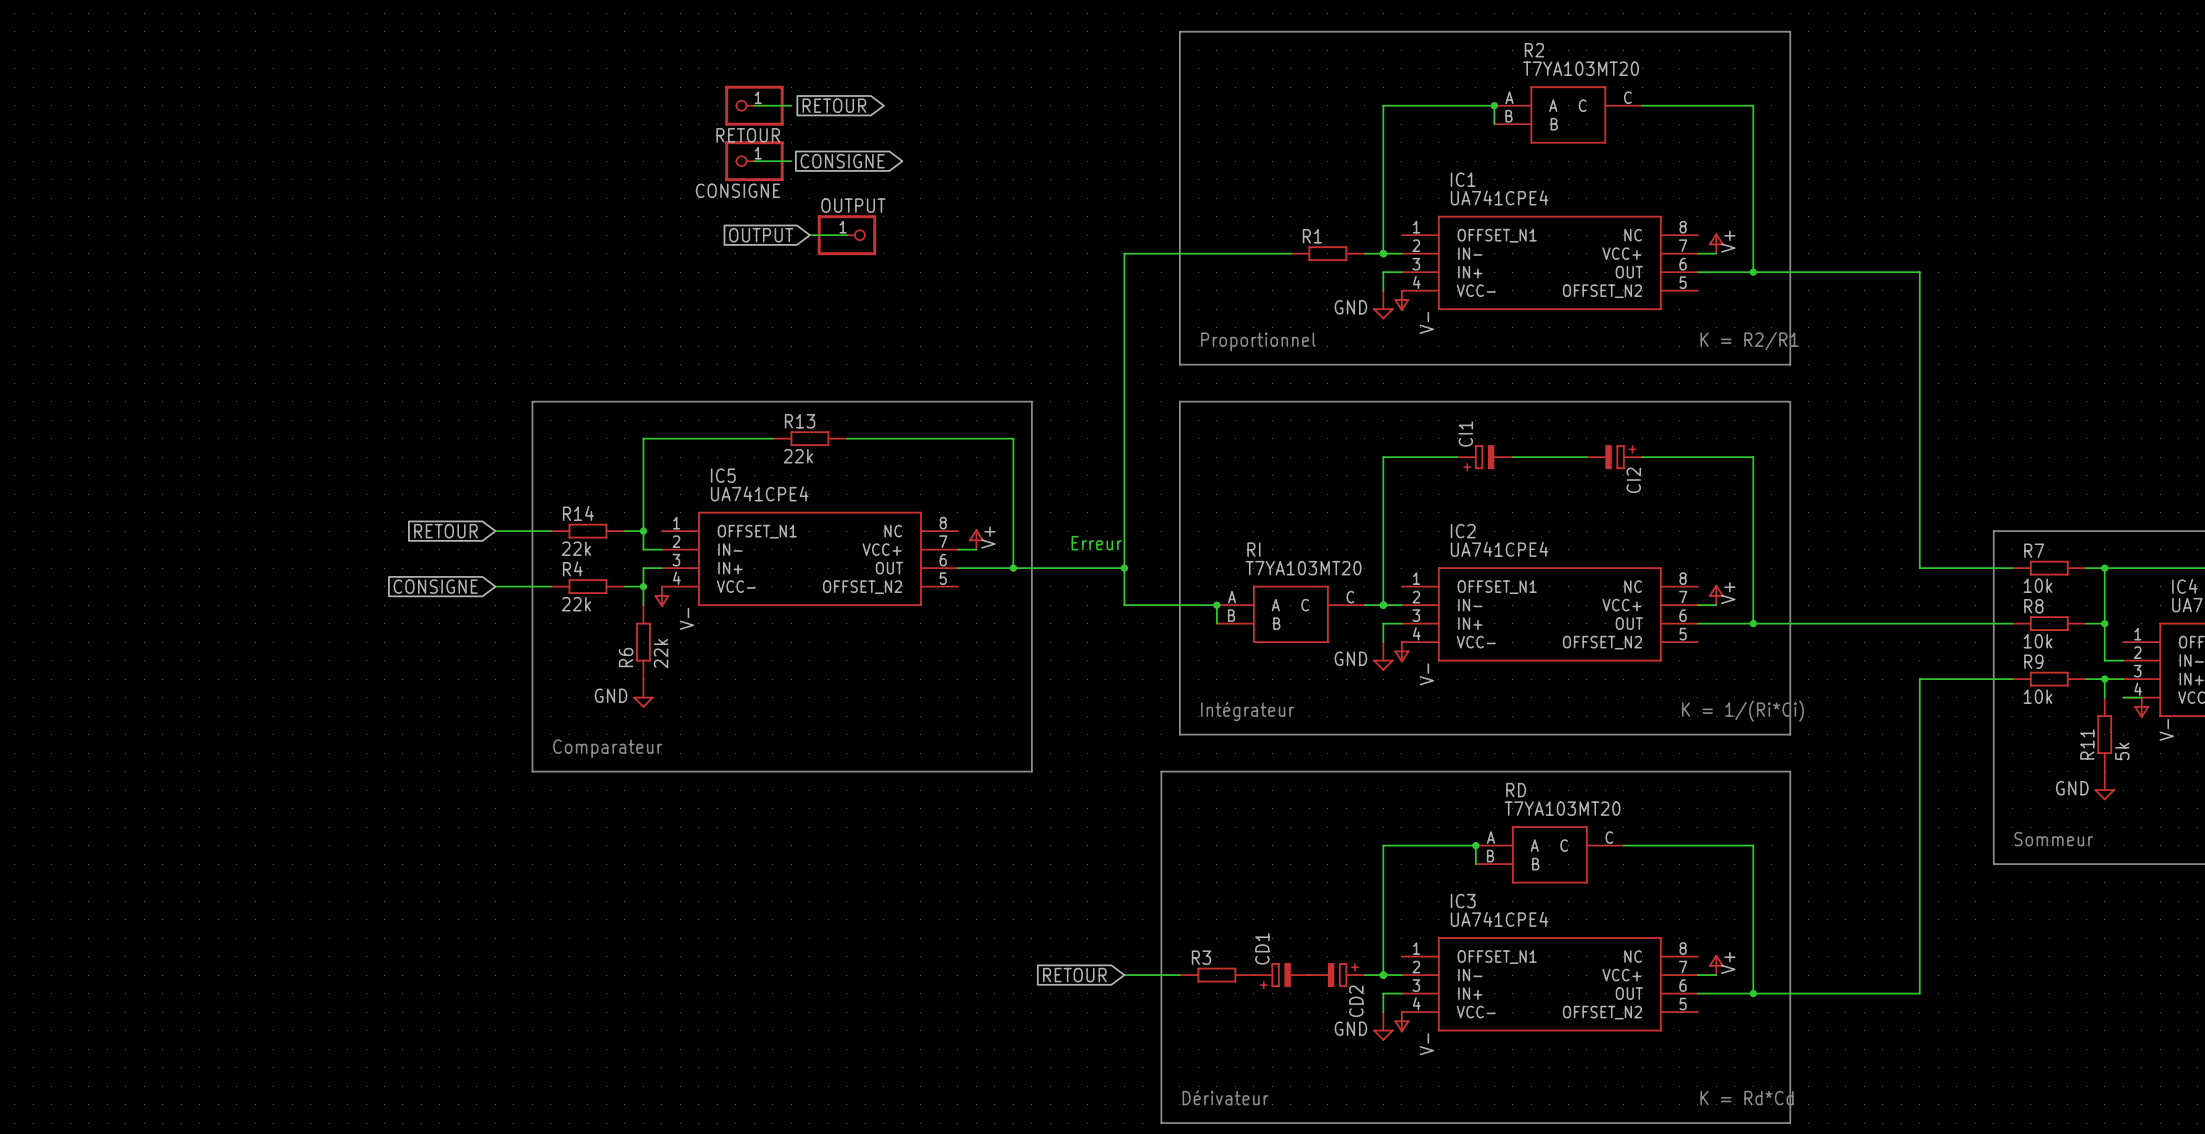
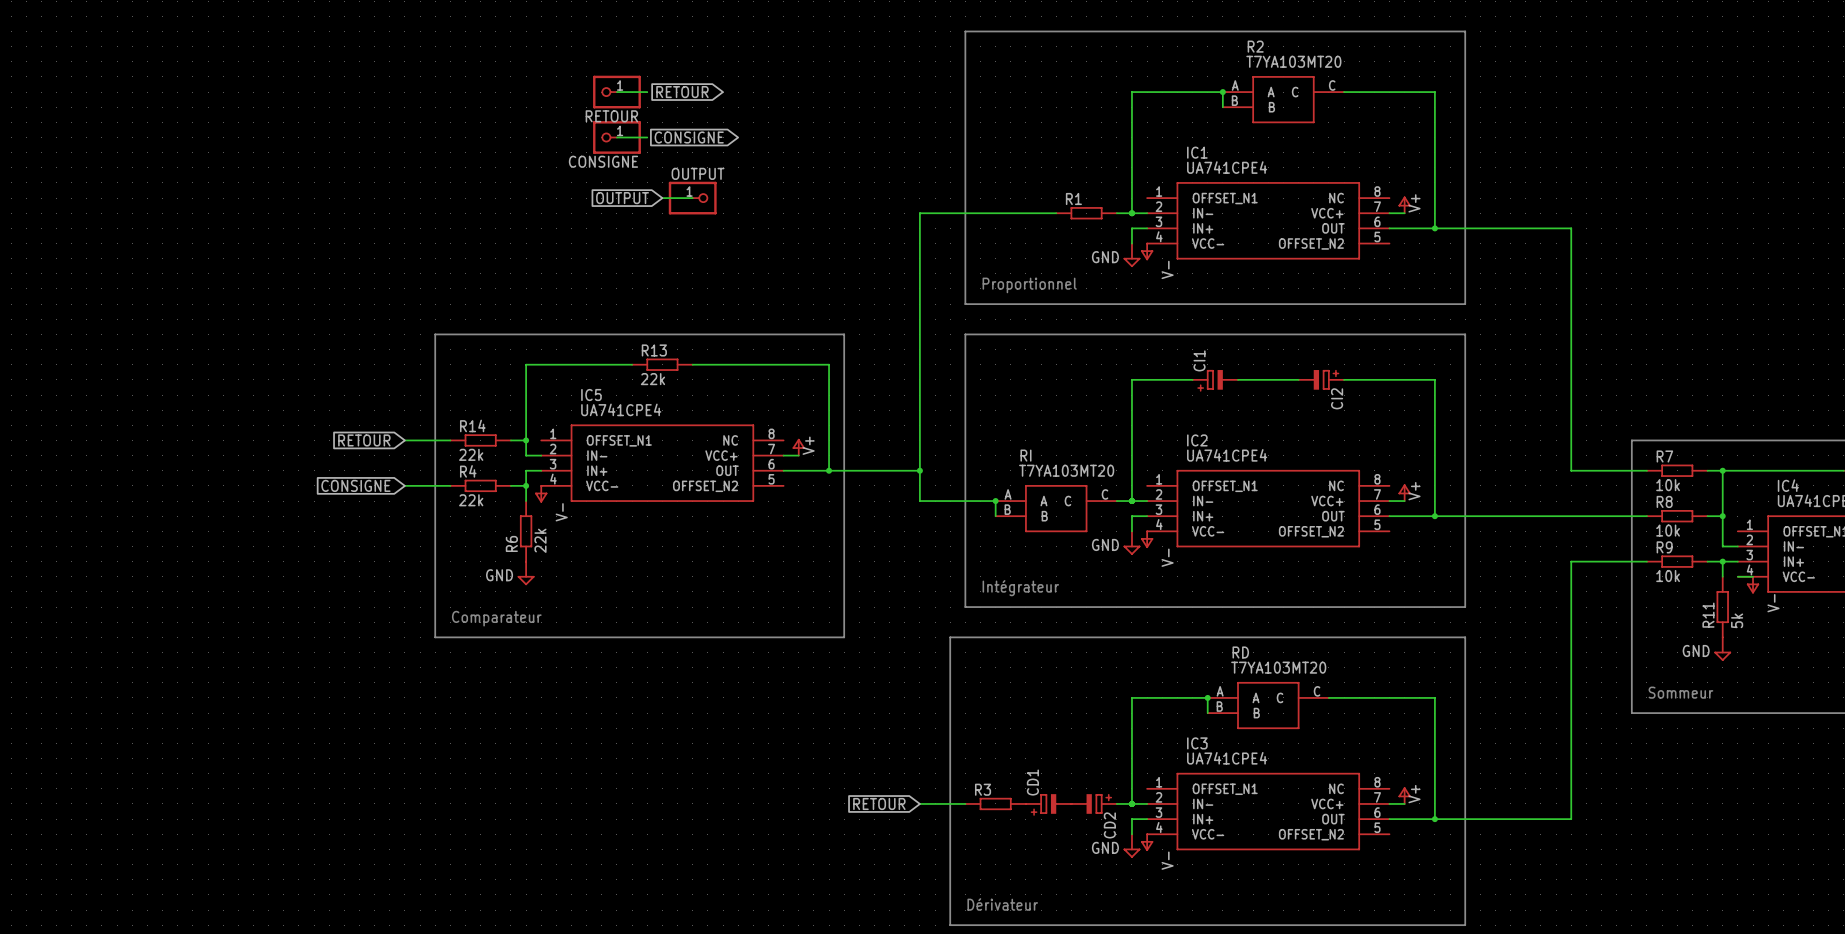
text: K = R2/R1 (1749, 340) -> none
text: Erreur (1096, 543) -> none
text: K = 1/(Ri*Ci) (1742, 711) -> none
text: K = Rd*Cd (1747, 1098) -> none

